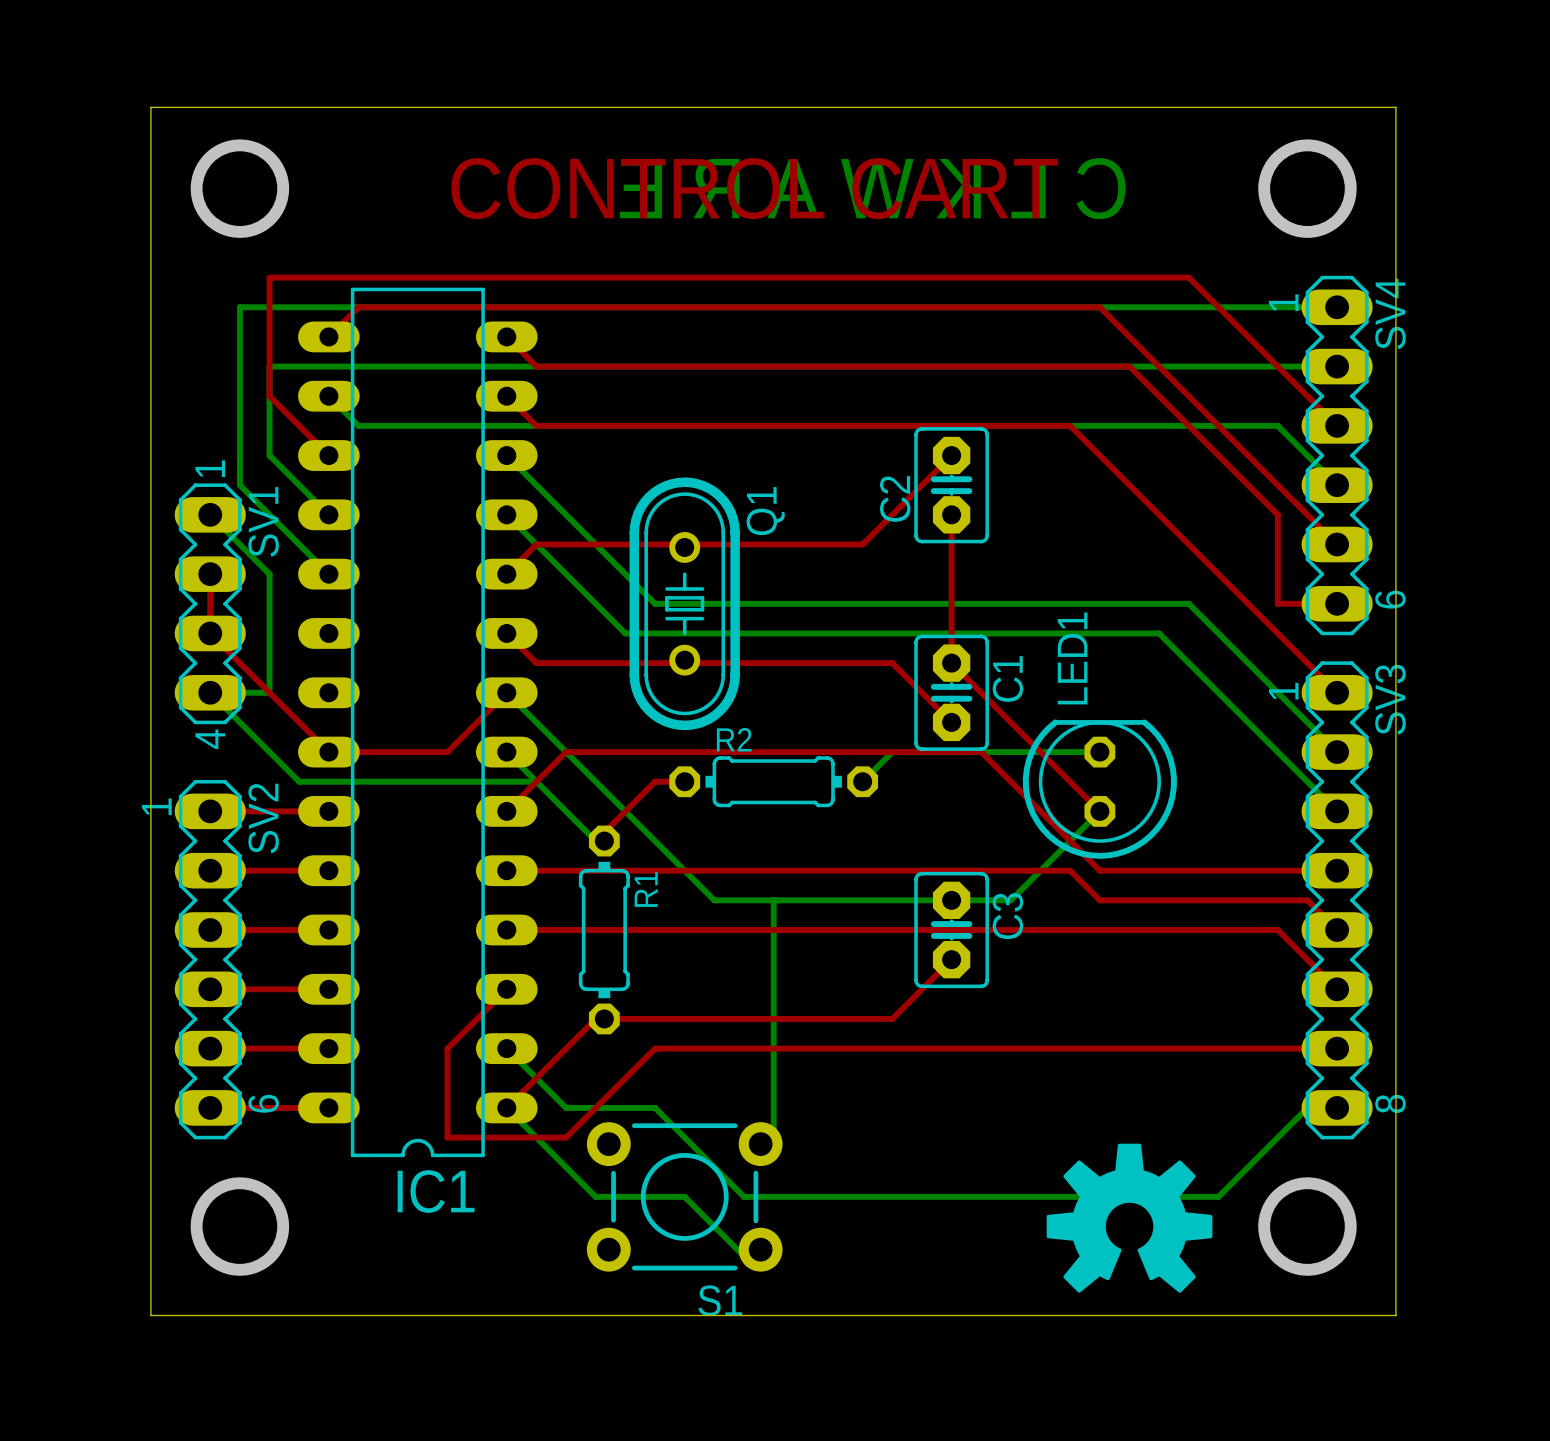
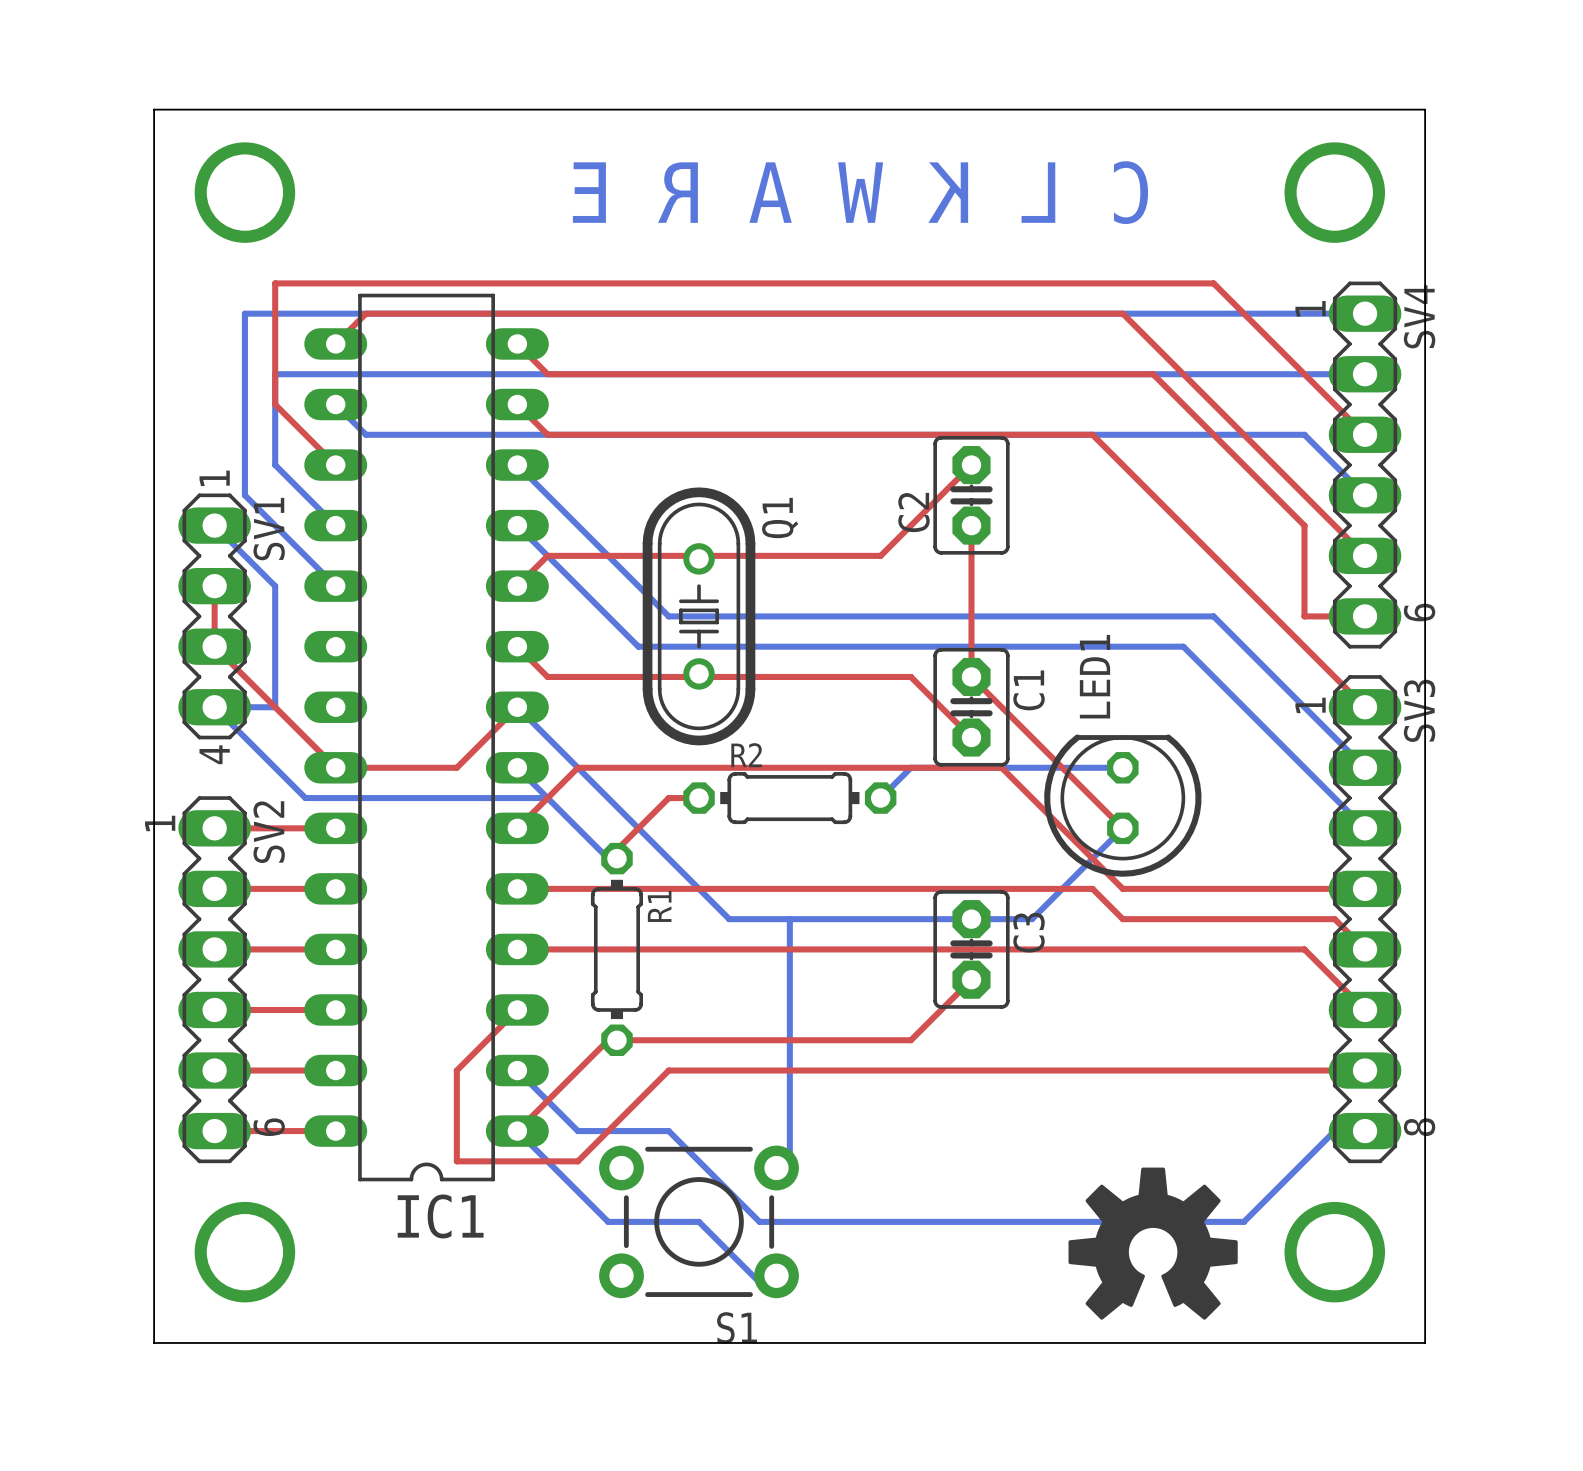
text: CONTROL CART (754, 188) -> none

